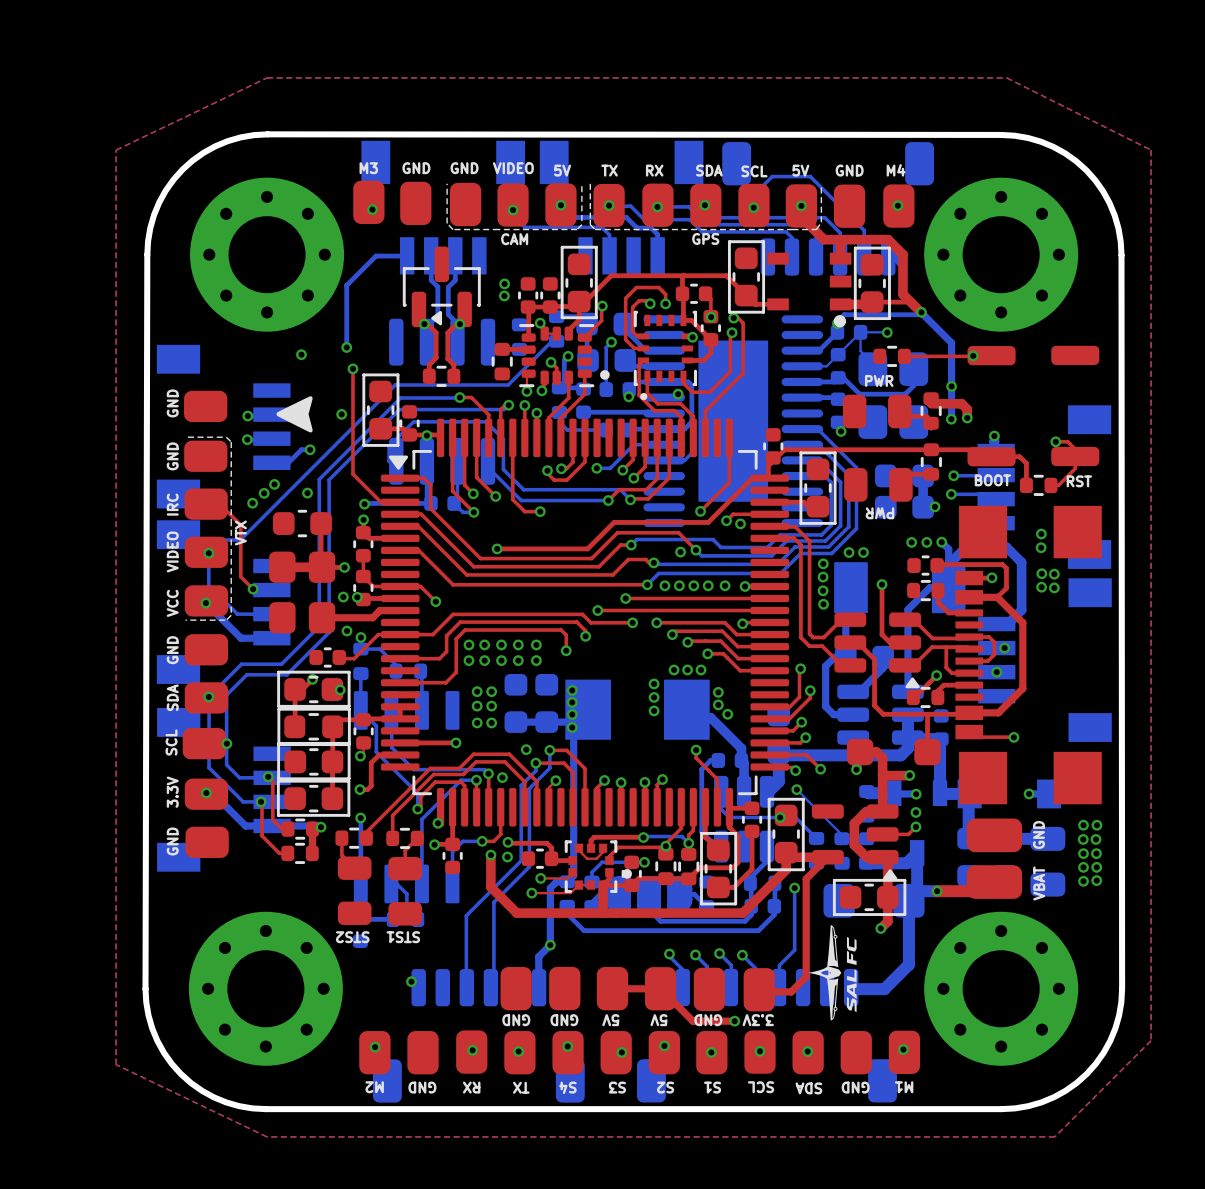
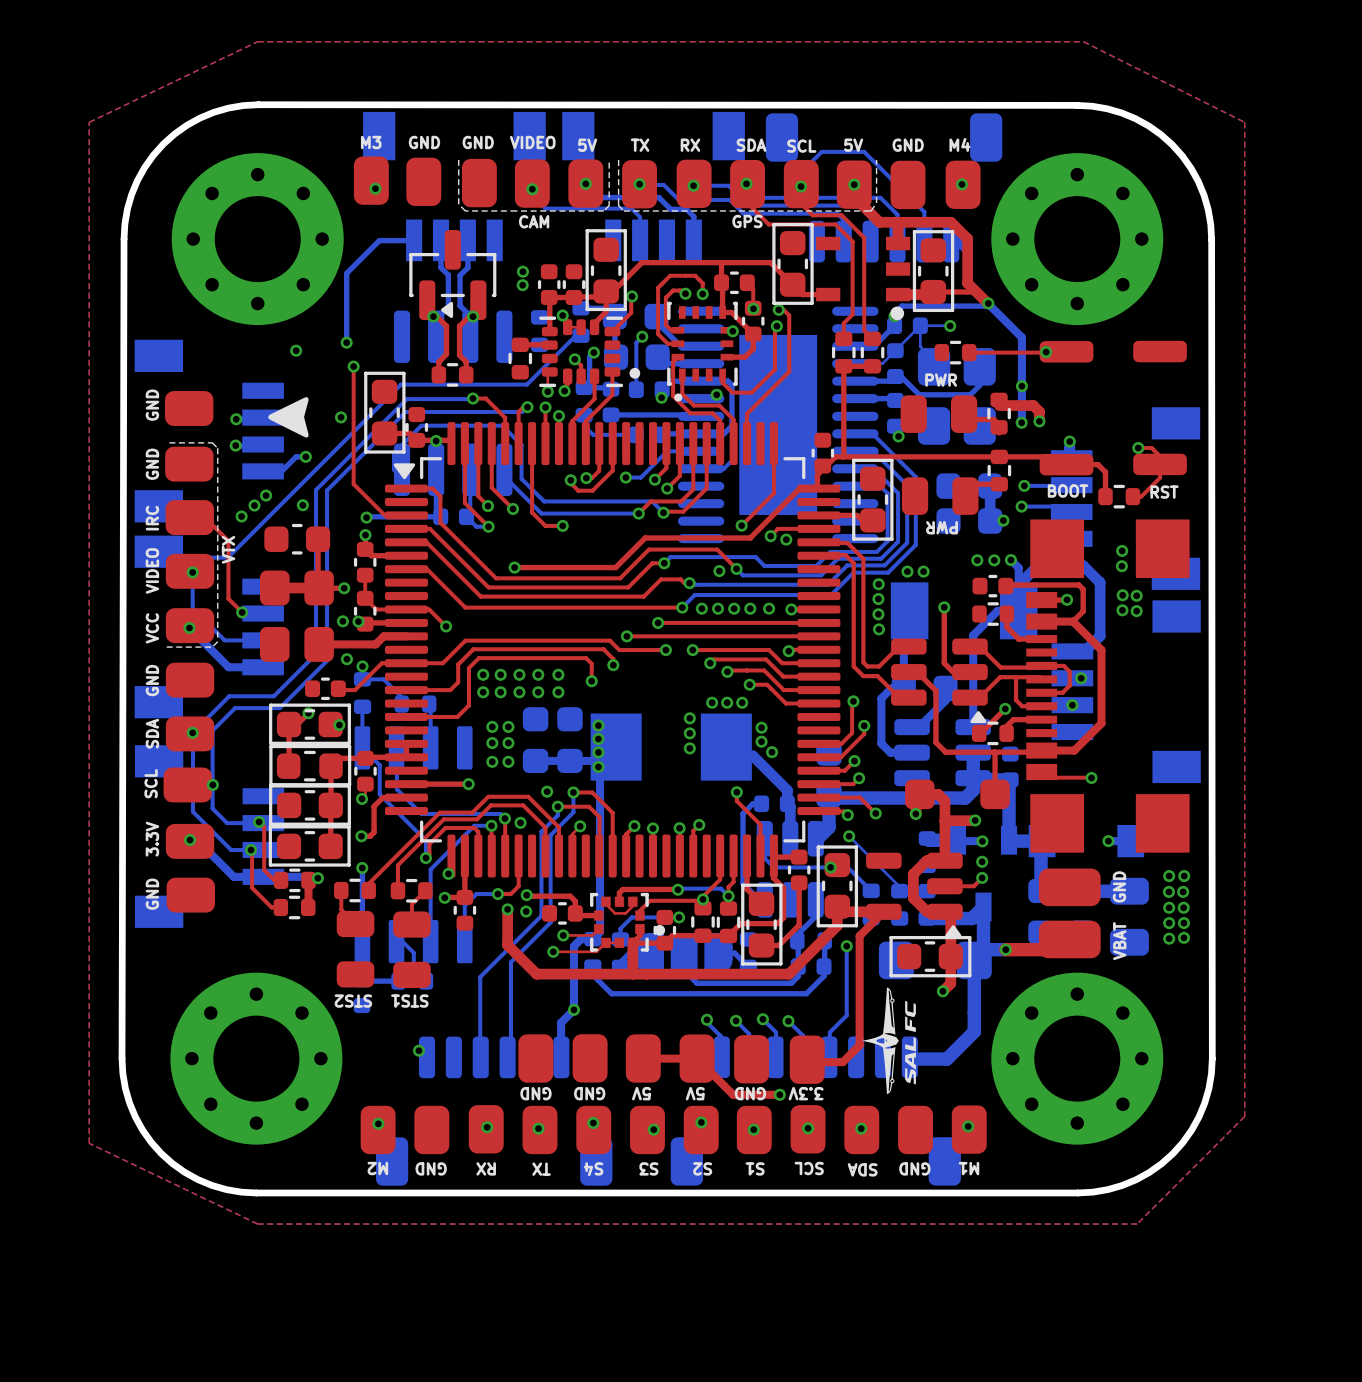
top track: none -> (747, 184) (747, 203) (768, 224) (835, 224) (852, 241) (852, 314) (843, 323) (843, 338)
top track: none -> (801, 184) (801, 204) (812, 215) (841, 215) (864, 237) (864, 330) (872, 338)
part: none -> (843, 352)
part: none -> (872, 352)
top track: none -> (872, 366) (843, 366) (843, 456)

